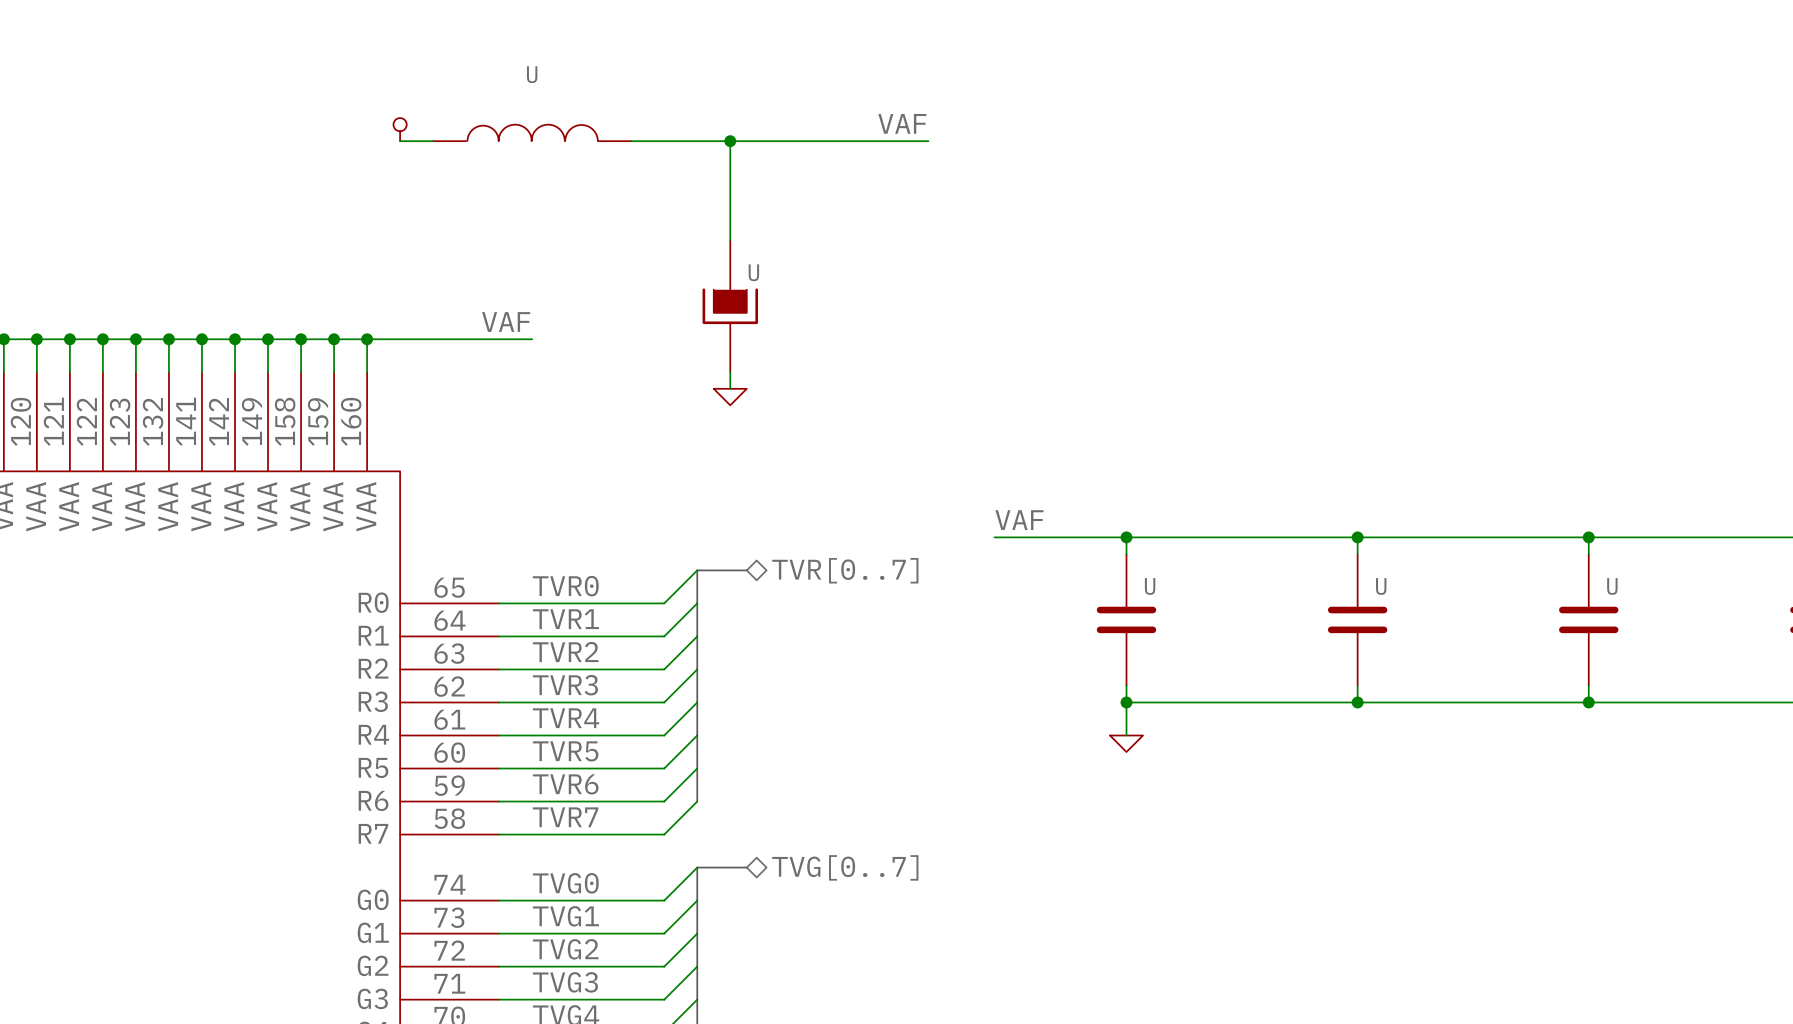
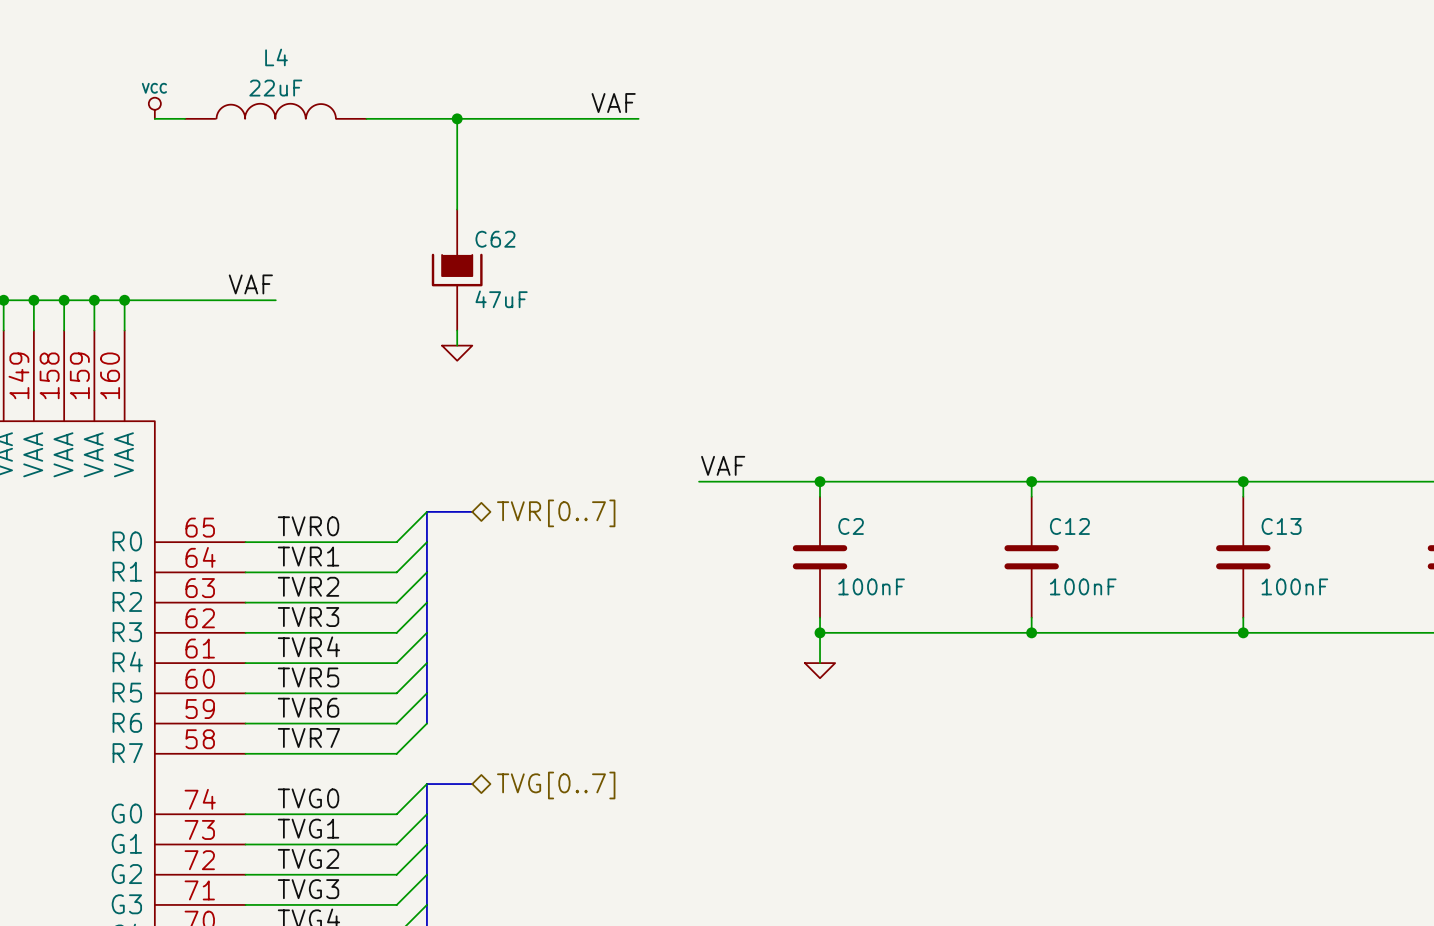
U name: U (532, 74) -> L4 (276, 57)
power symbol text: none -> VCC (154, 88)
U value: none -> 22uF (275, 88)
U name: U (753, 272) -> C62 (495, 239)
U value: none -> 47uF (501, 299)
U name: U (1150, 586) -> C2 (851, 526)
U name: U (1381, 586) -> C12 (1069, 526)
U name: U (1612, 586) -> C13 (1281, 526)
U value: none -> 100nF (871, 586)
U value: none -> 100nF (1083, 586)
U value: none -> 100nF (1294, 586)

